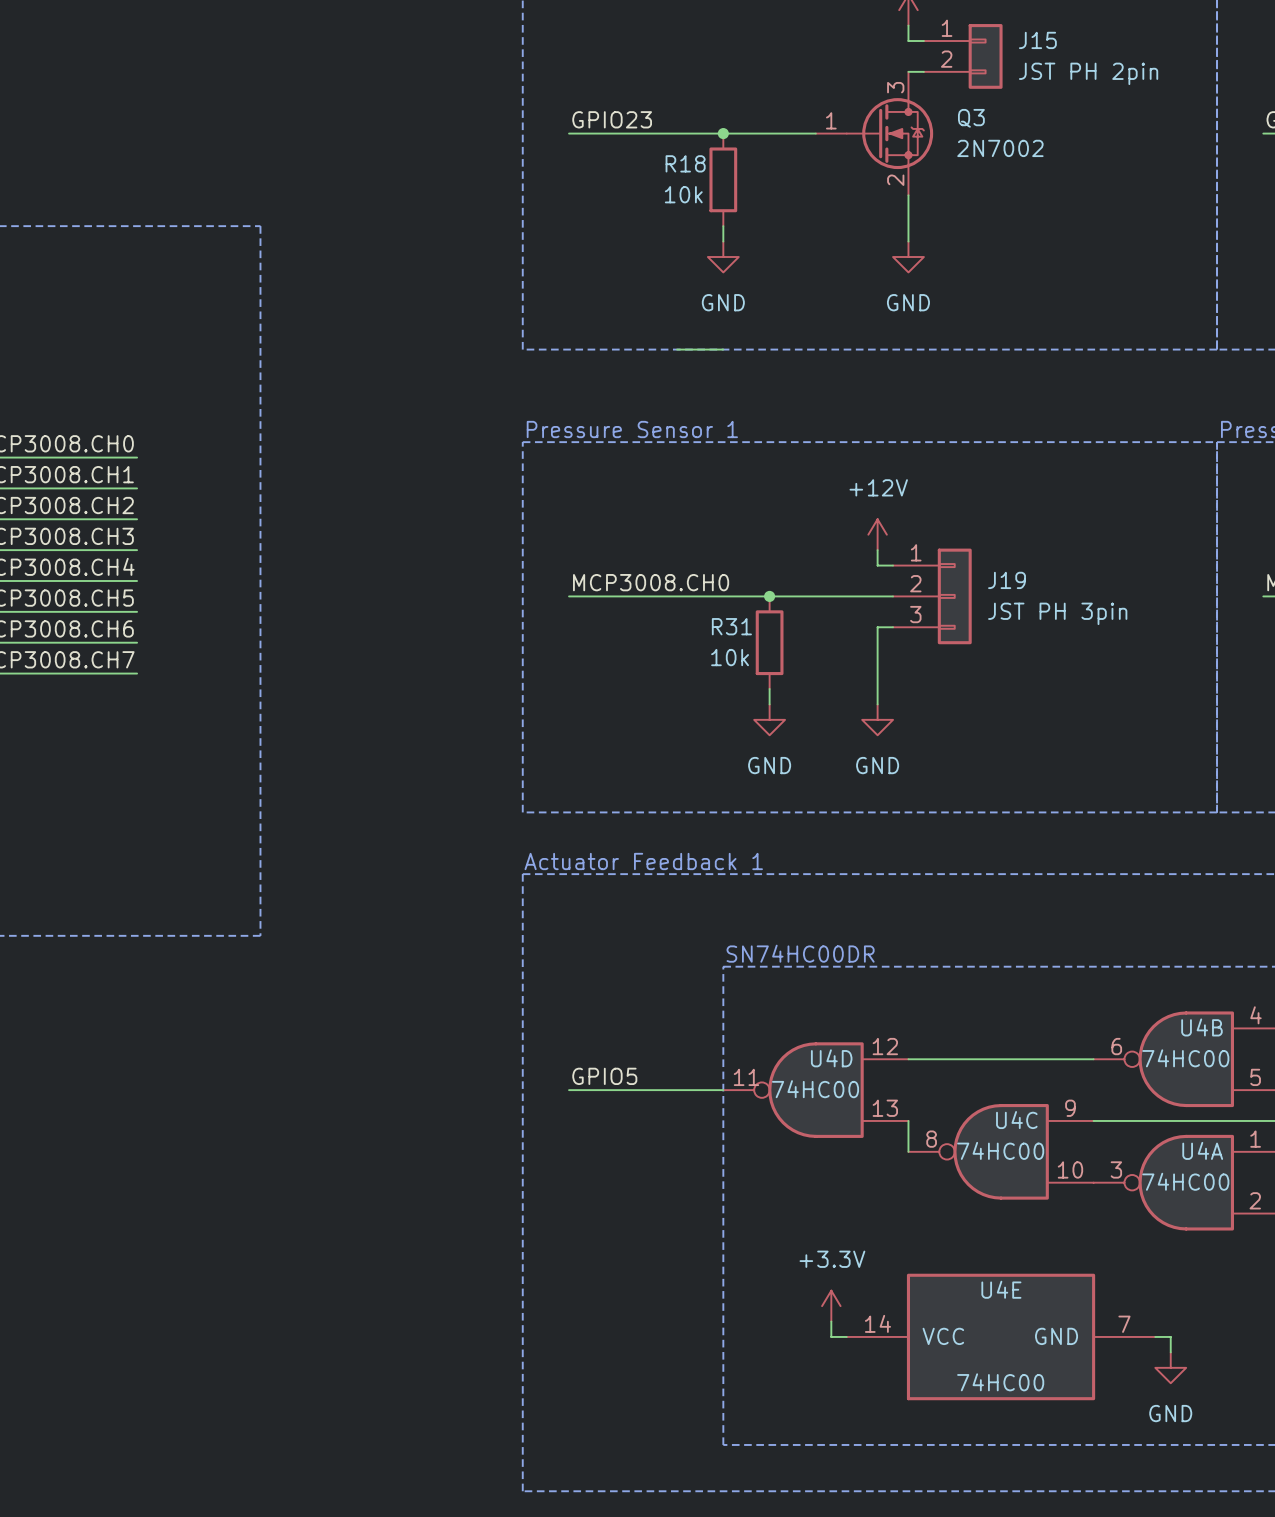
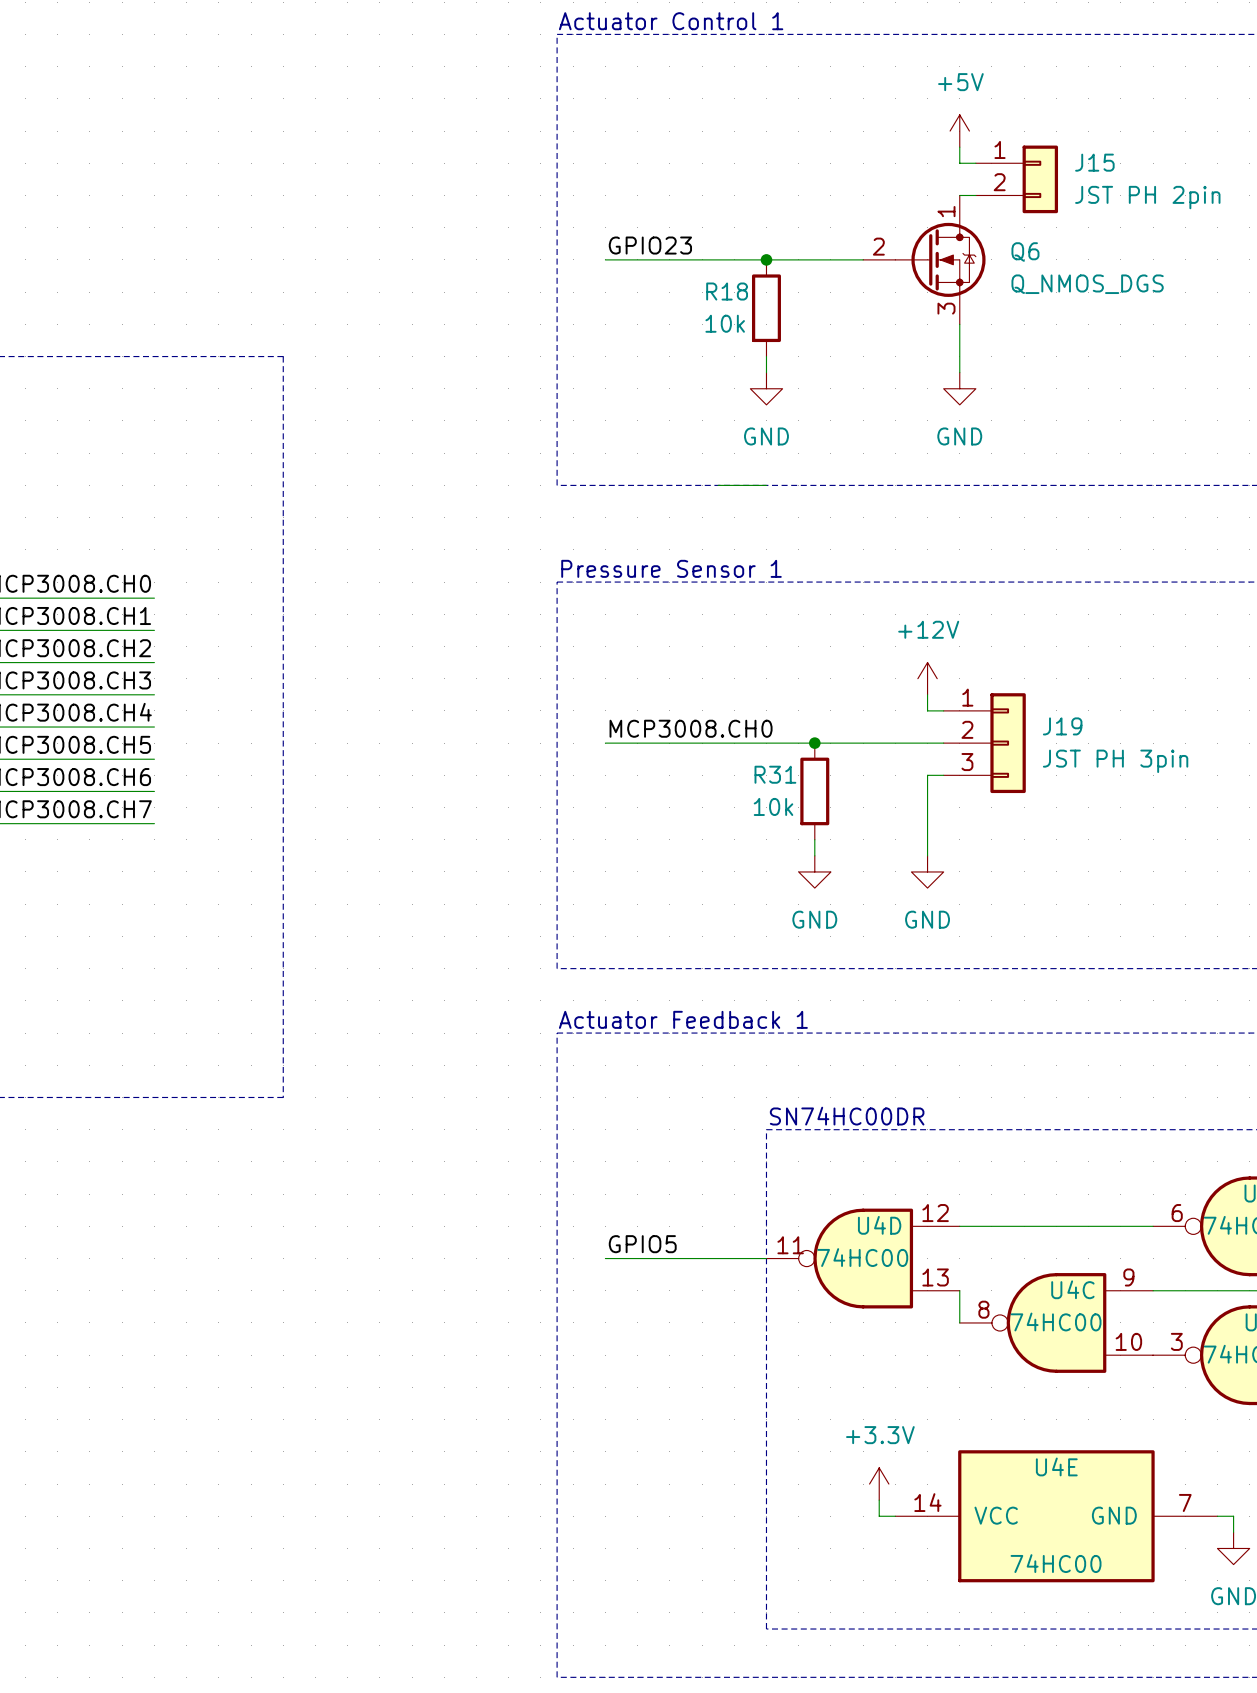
Q3 pin number: 3 (895, 87) -> 1 (946, 211)
Q3 name: Q3 (971, 118) -> Q6 (1025, 252)
Q3 pin number: 1 (831, 120) -> 2 (878, 246)
Q3 value: 2N7002 (1000, 148) -> Q_NMOS_DGS (1087, 284)
Q3 pin number: 2 (895, 180) -> 3 (946, 308)

